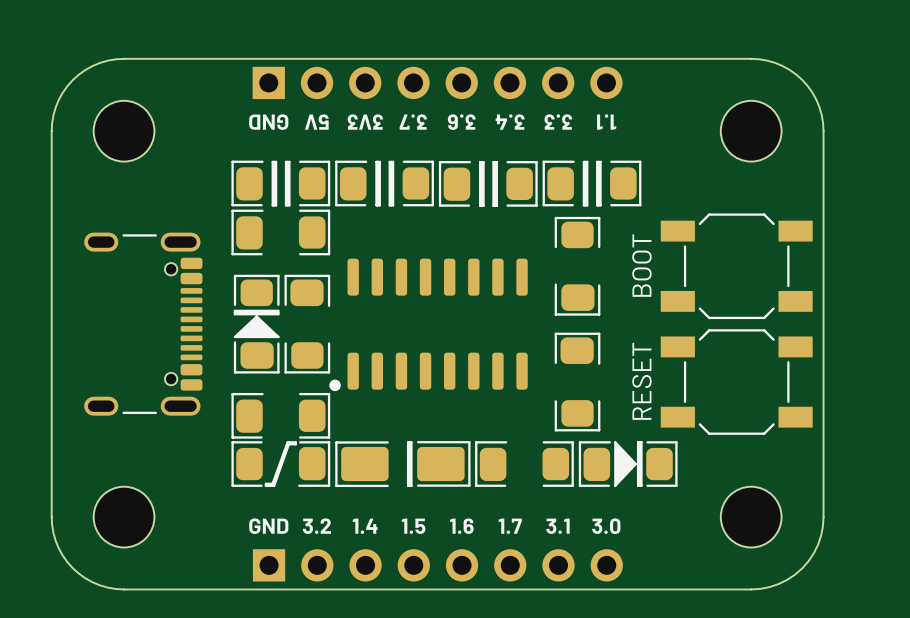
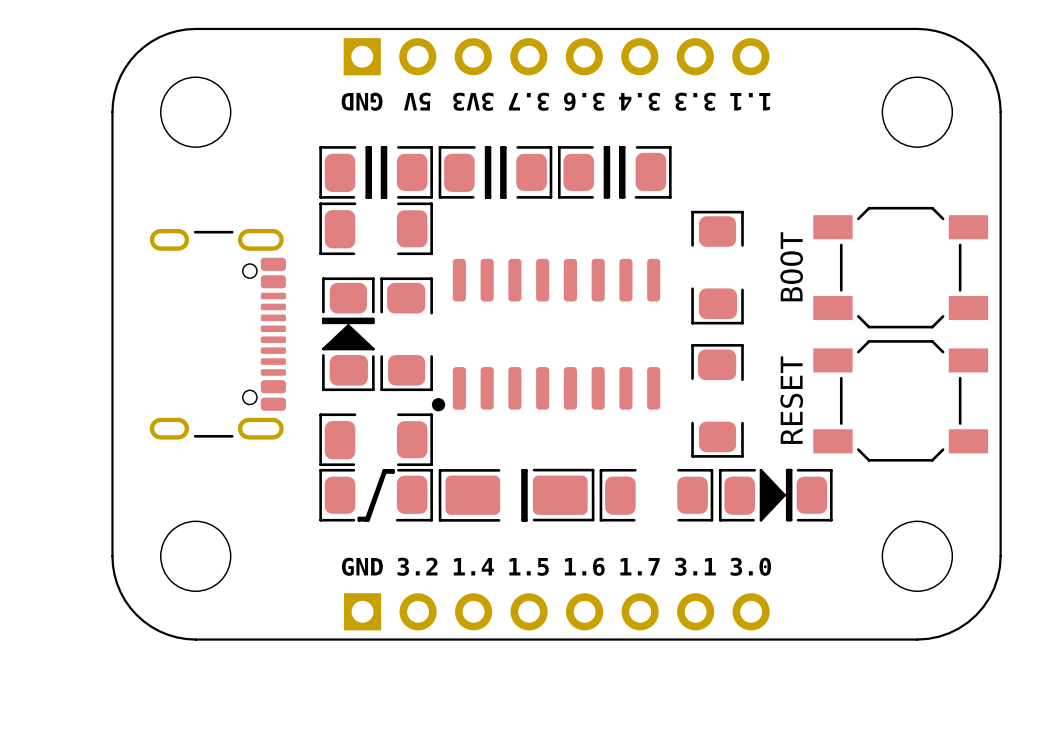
part rotation: 0° (488, 183) -> 180° (614, 172)
part: (591, 183) -> none

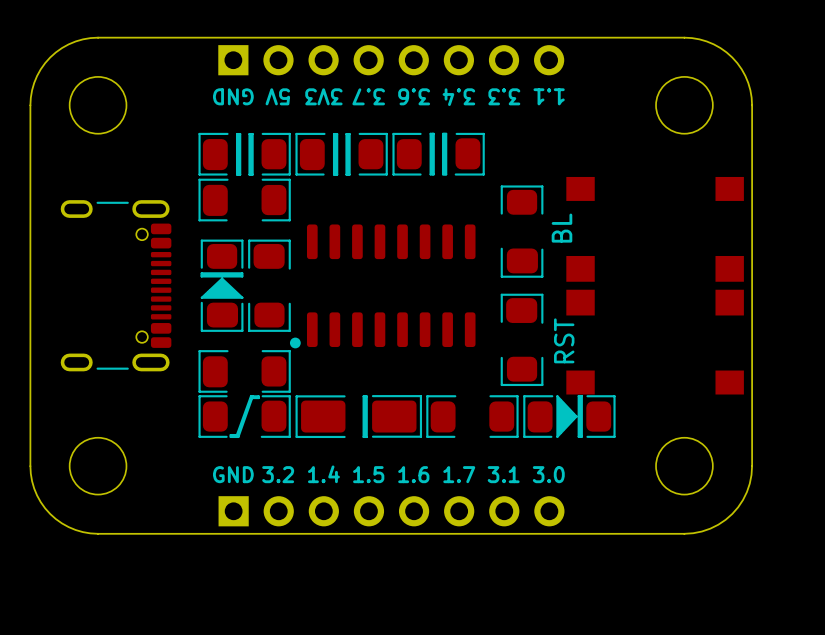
part footprint: [813, 206, 989, 329] -> [566, 176, 744, 282]
part value: BOOT (791, 266) -> BL (561, 228)
part footprint: [813, 340, 989, 462] -> [566, 289, 744, 395]
part value: RESET (791, 400) -> RST (564, 340)

